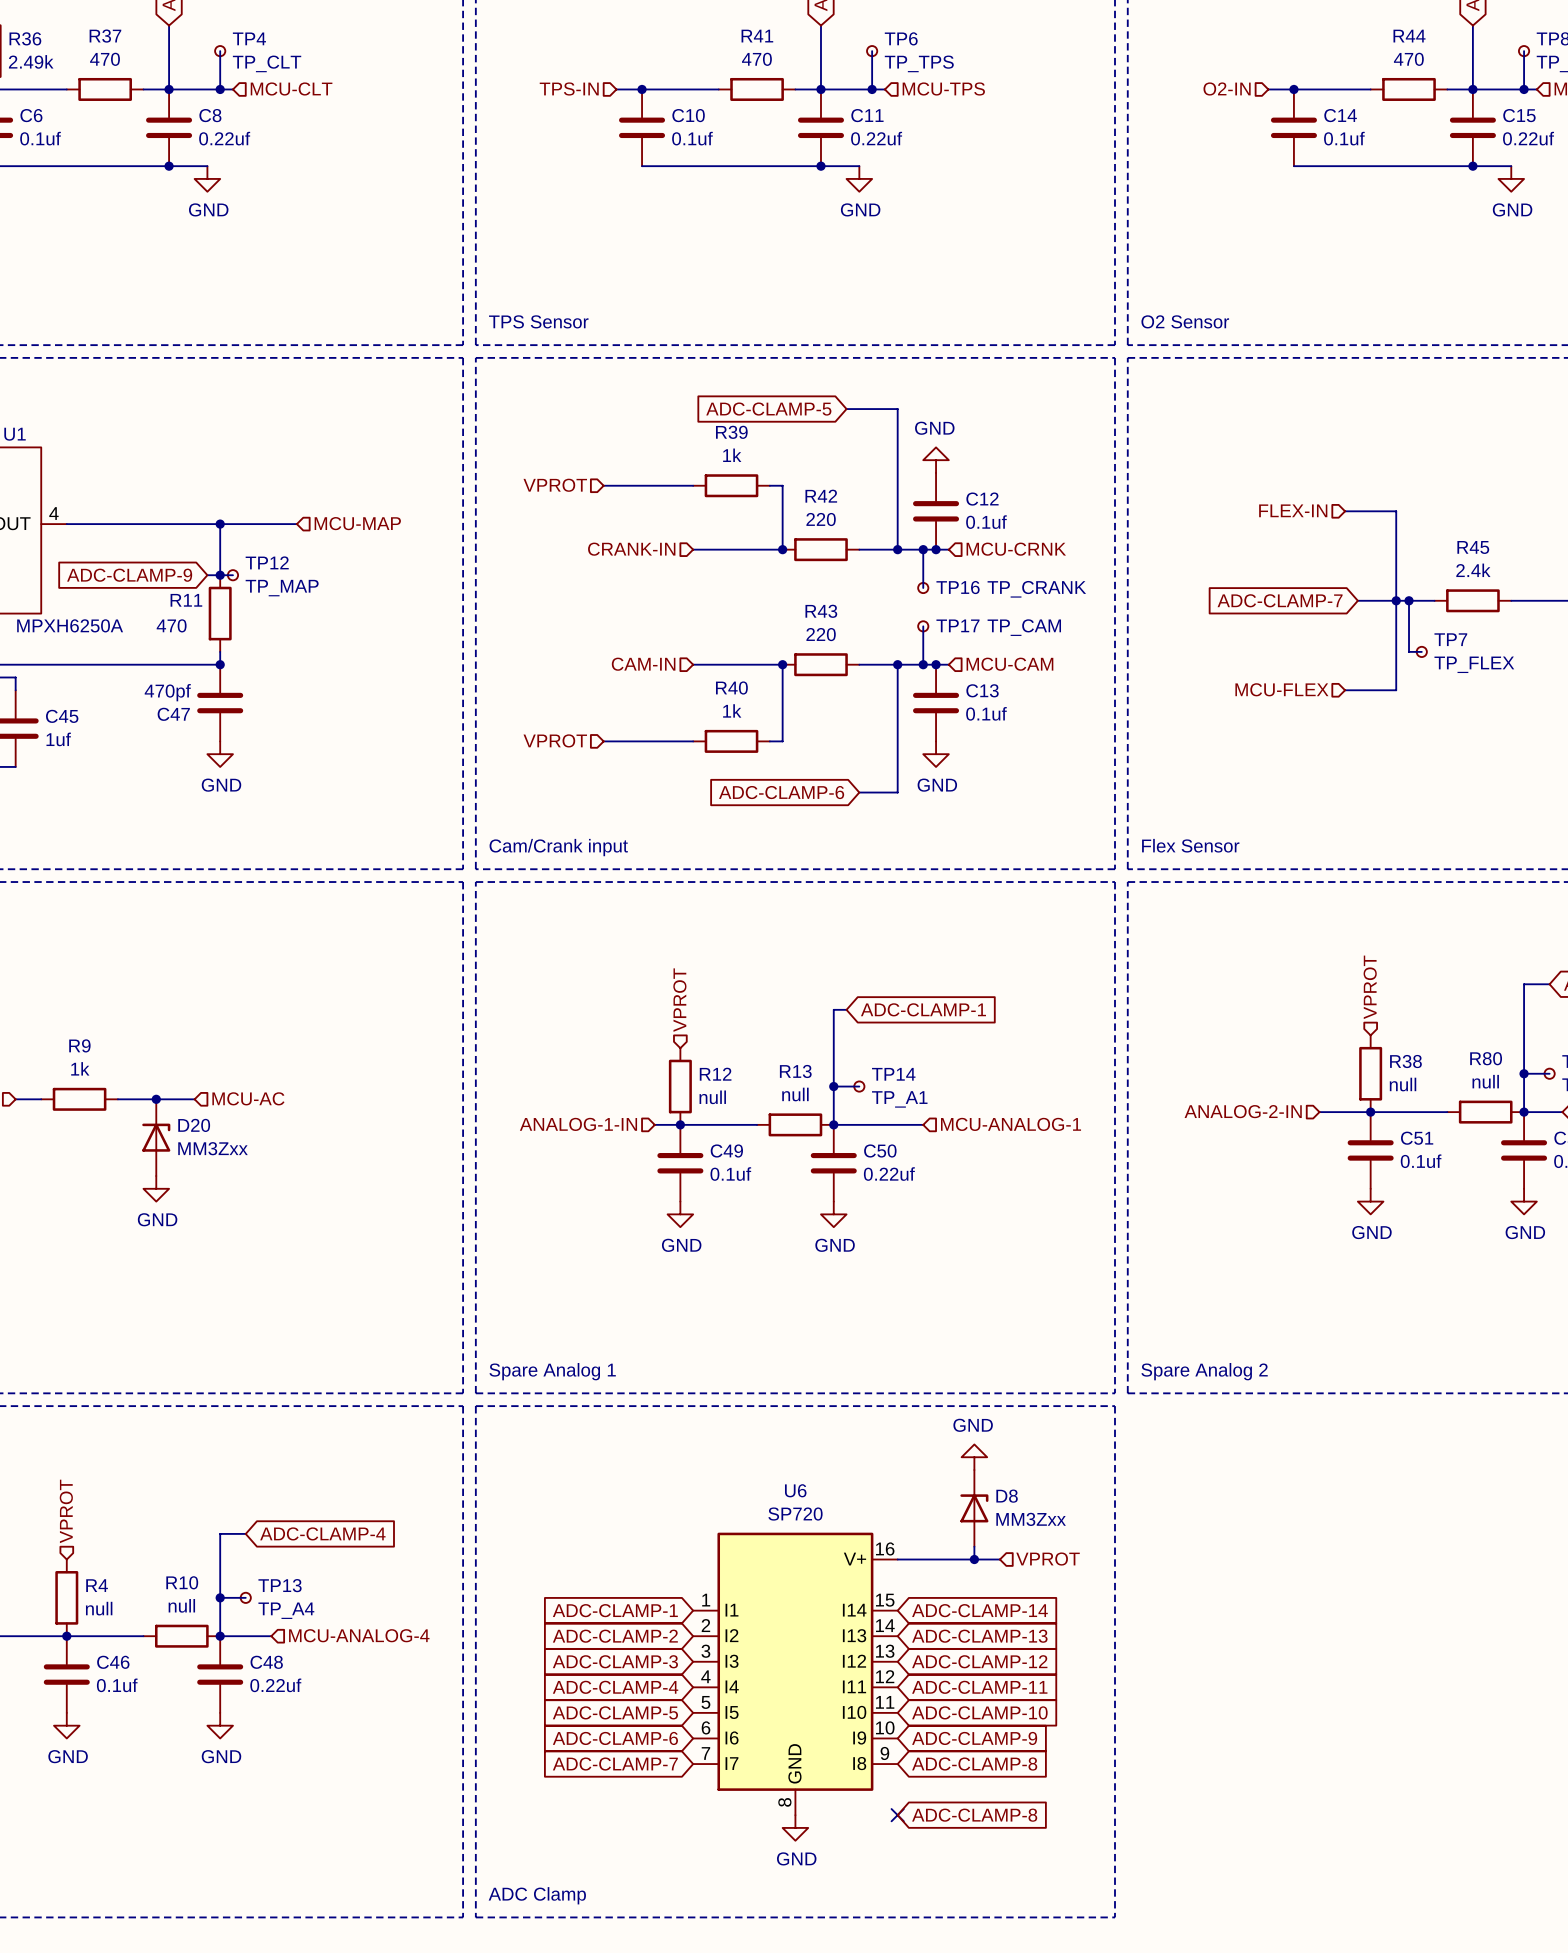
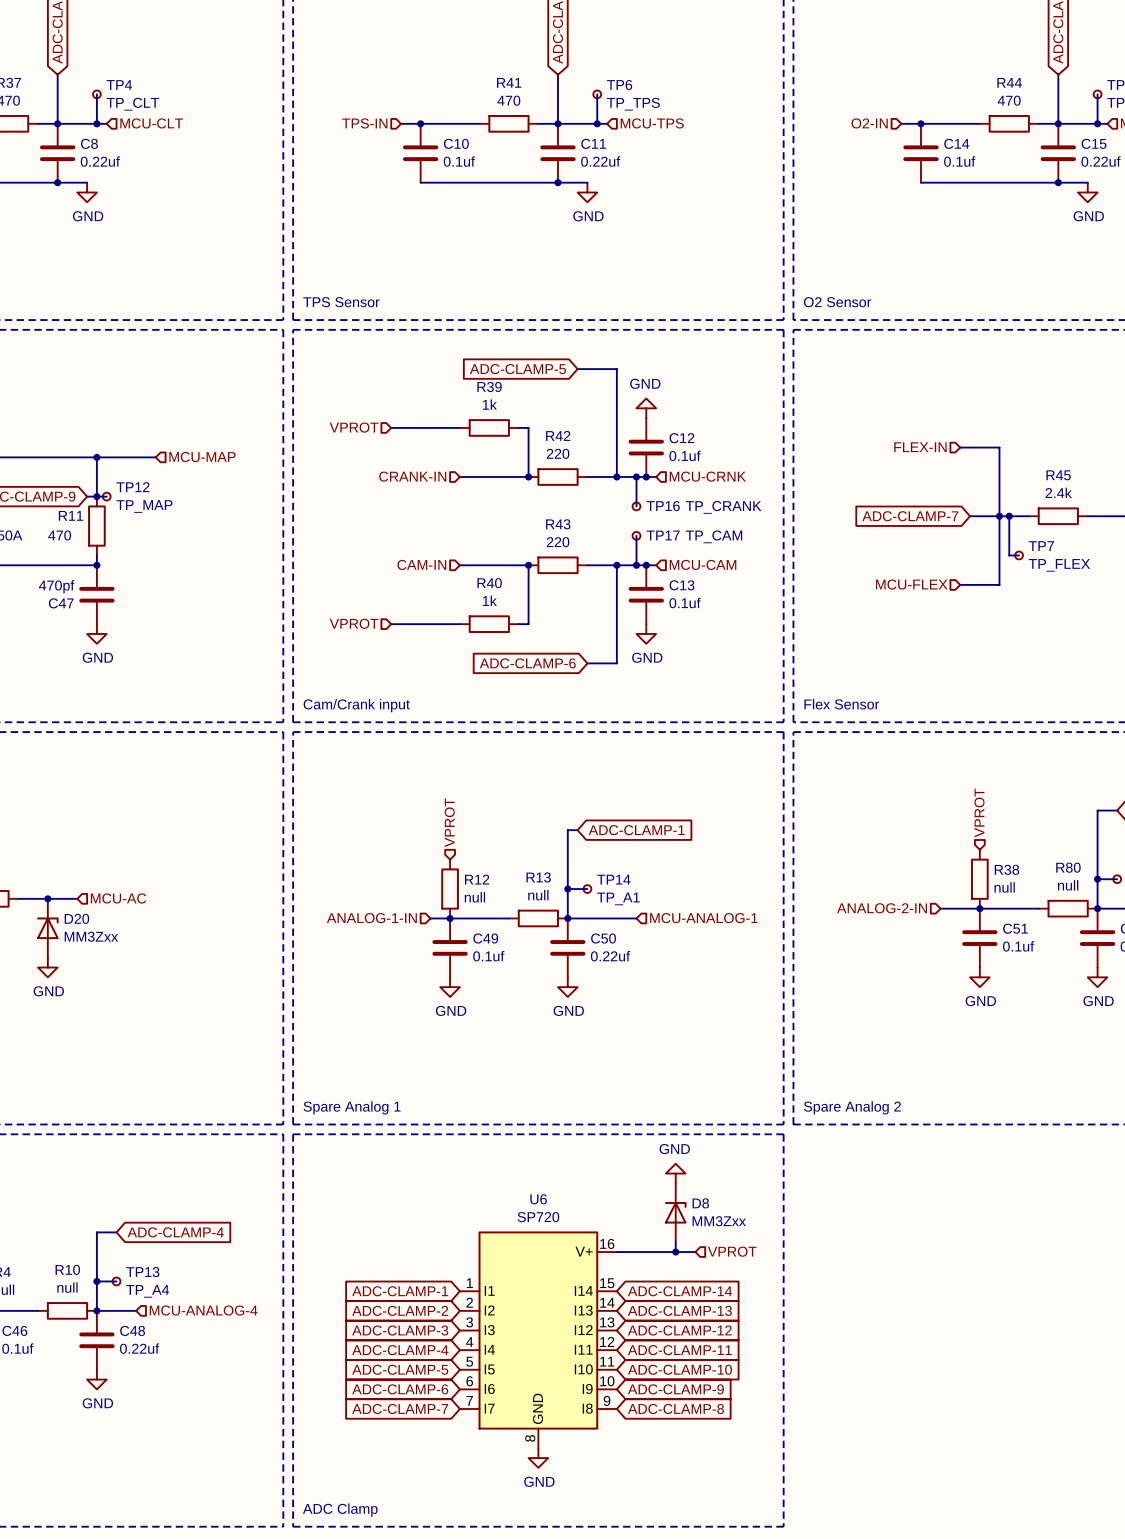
no-connect mark: (897, 1815) -> none
global label: ADC-CLAMP-8 (974, 1815) -> none

